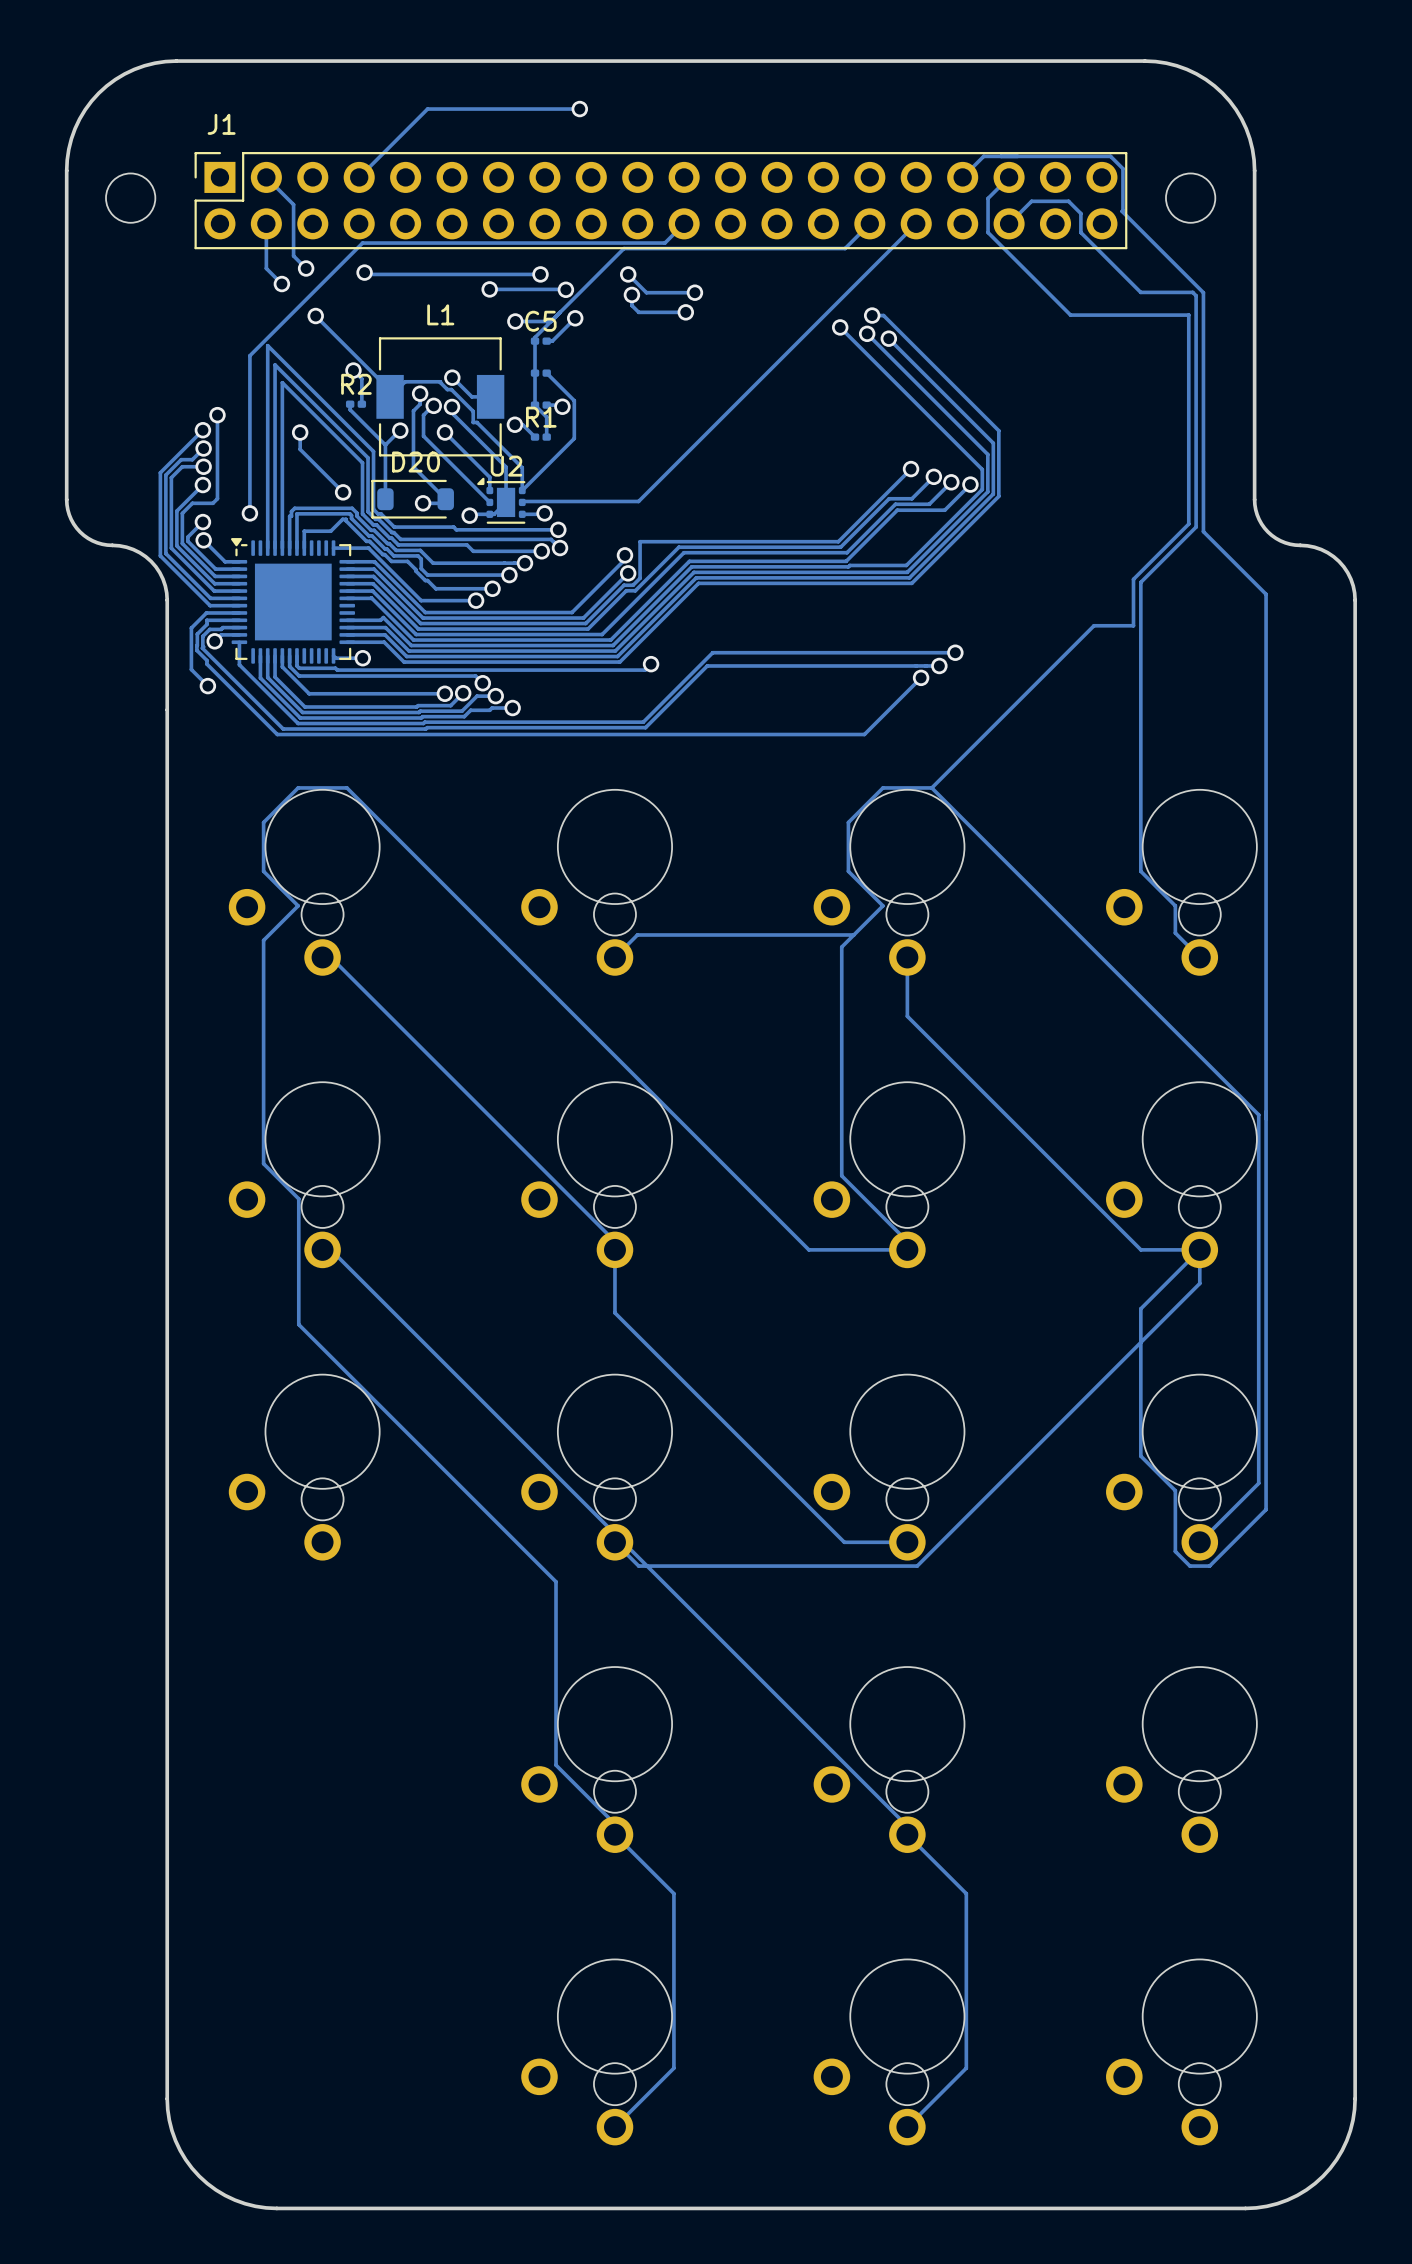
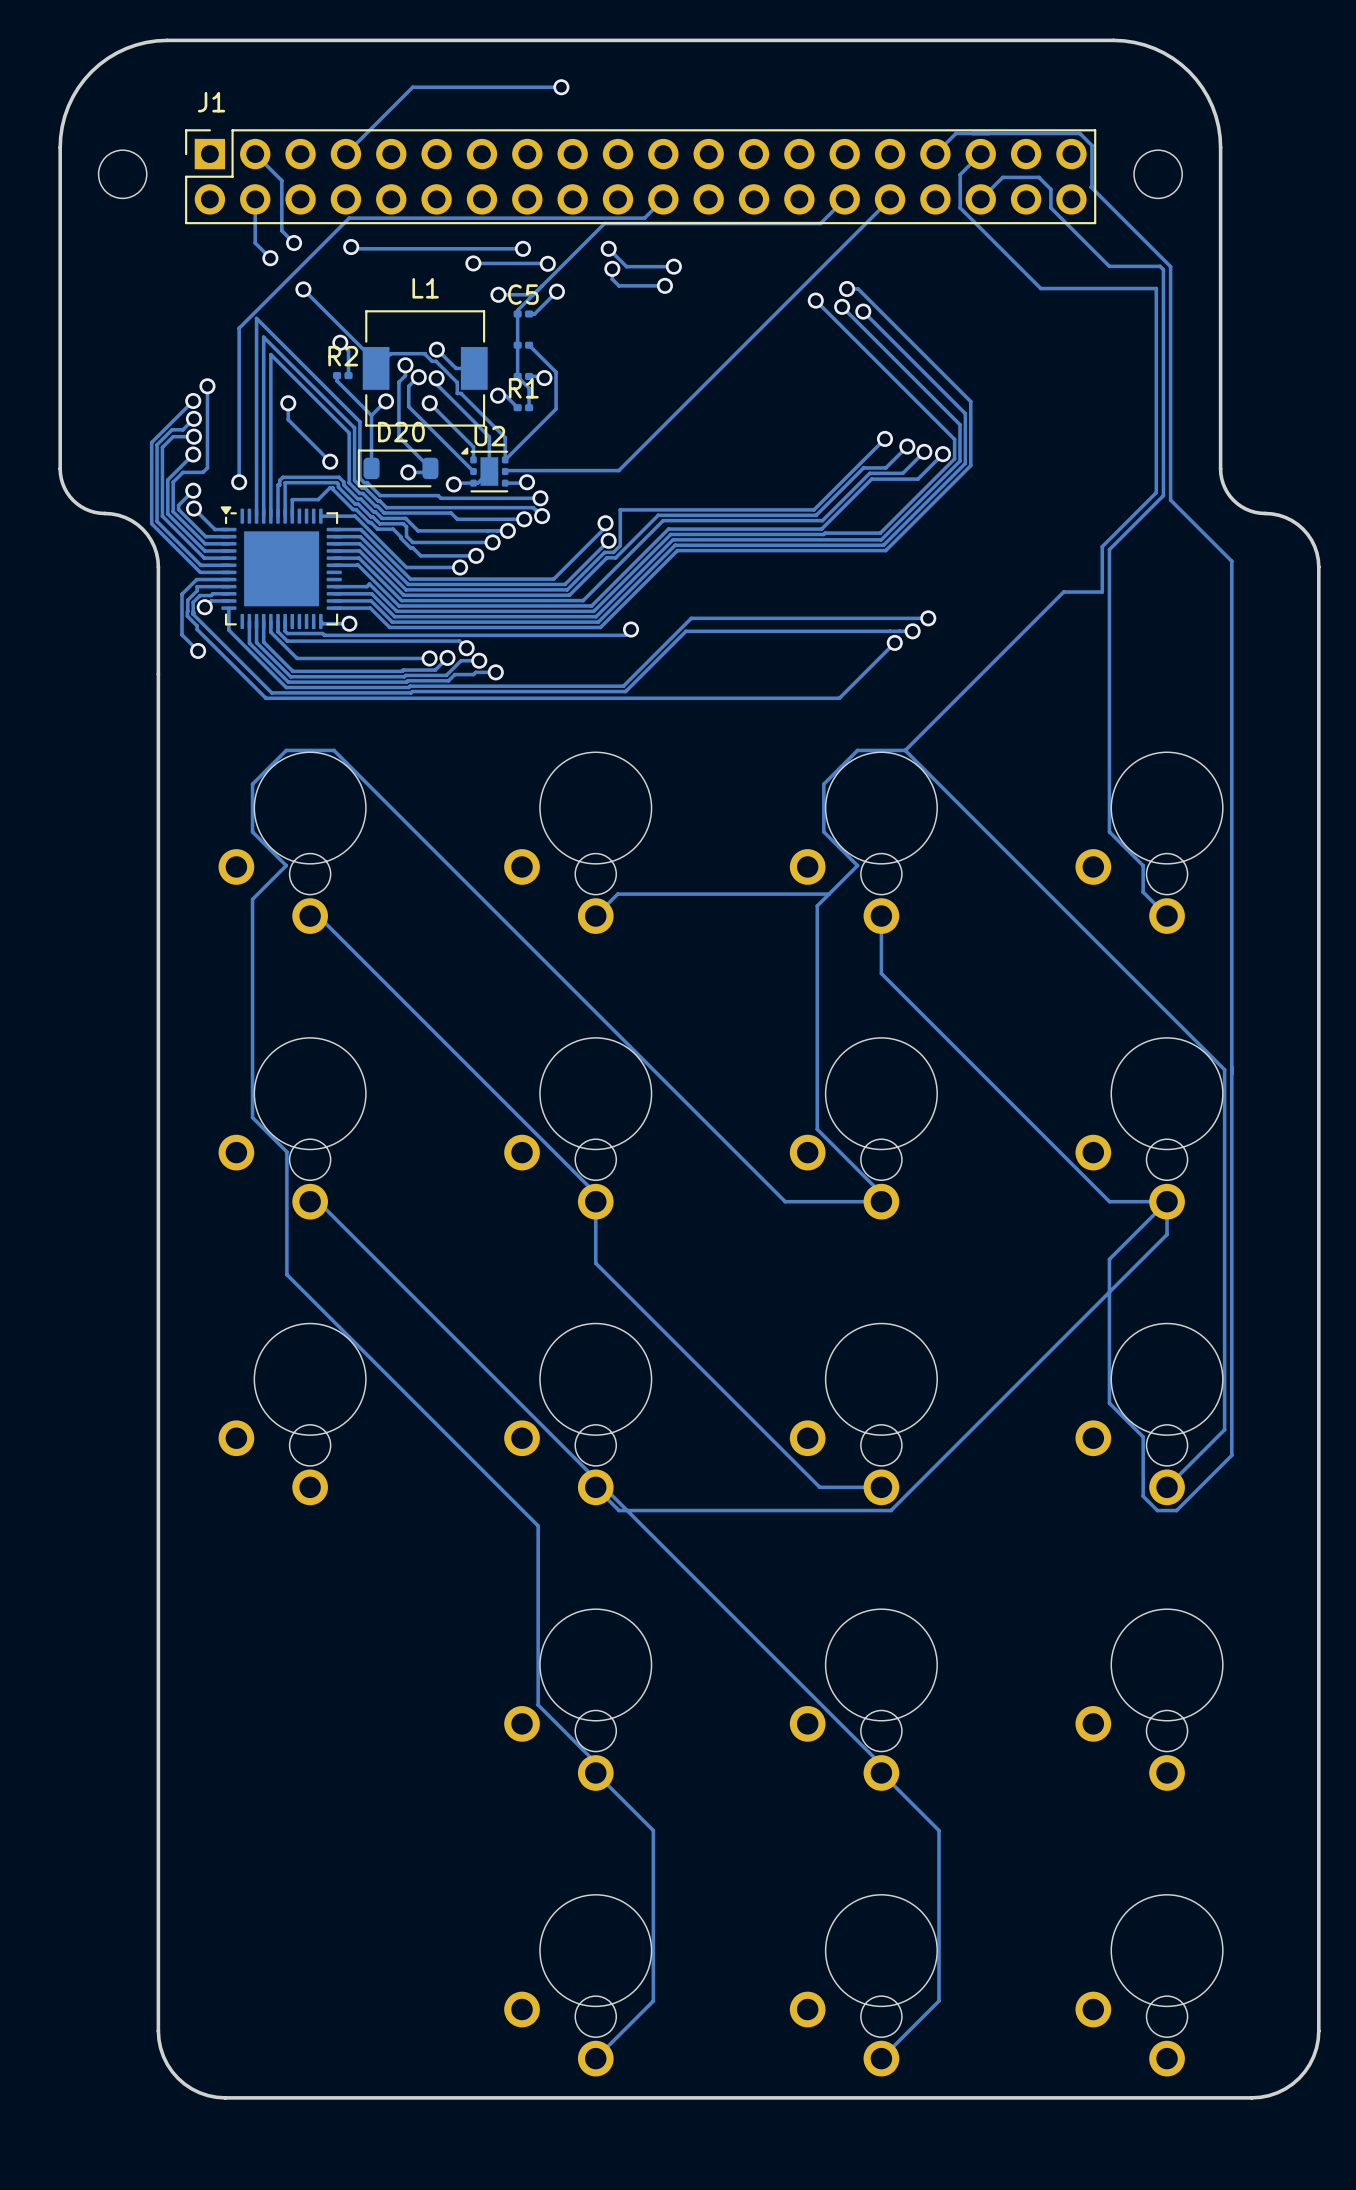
board edge: (1355, 2098) (1353, 2120) (1346, 2140) (1336, 2159) (1323, 2176) (1306, 2189) (1287, 2200) (1266, 2206) (1245, 2208) (266, 2207) (245, 2203) (225, 2195) (207, 2183) (192, 2168) (180, 2150) (171, 2130) (167, 2098) -> (1318, 2030) (1313, 2056) (1299, 2078) (1277, 2092) (1251, 2097) (225, 2097) (199, 2092) (177, 2078) (163, 2056) (158, 2030)

